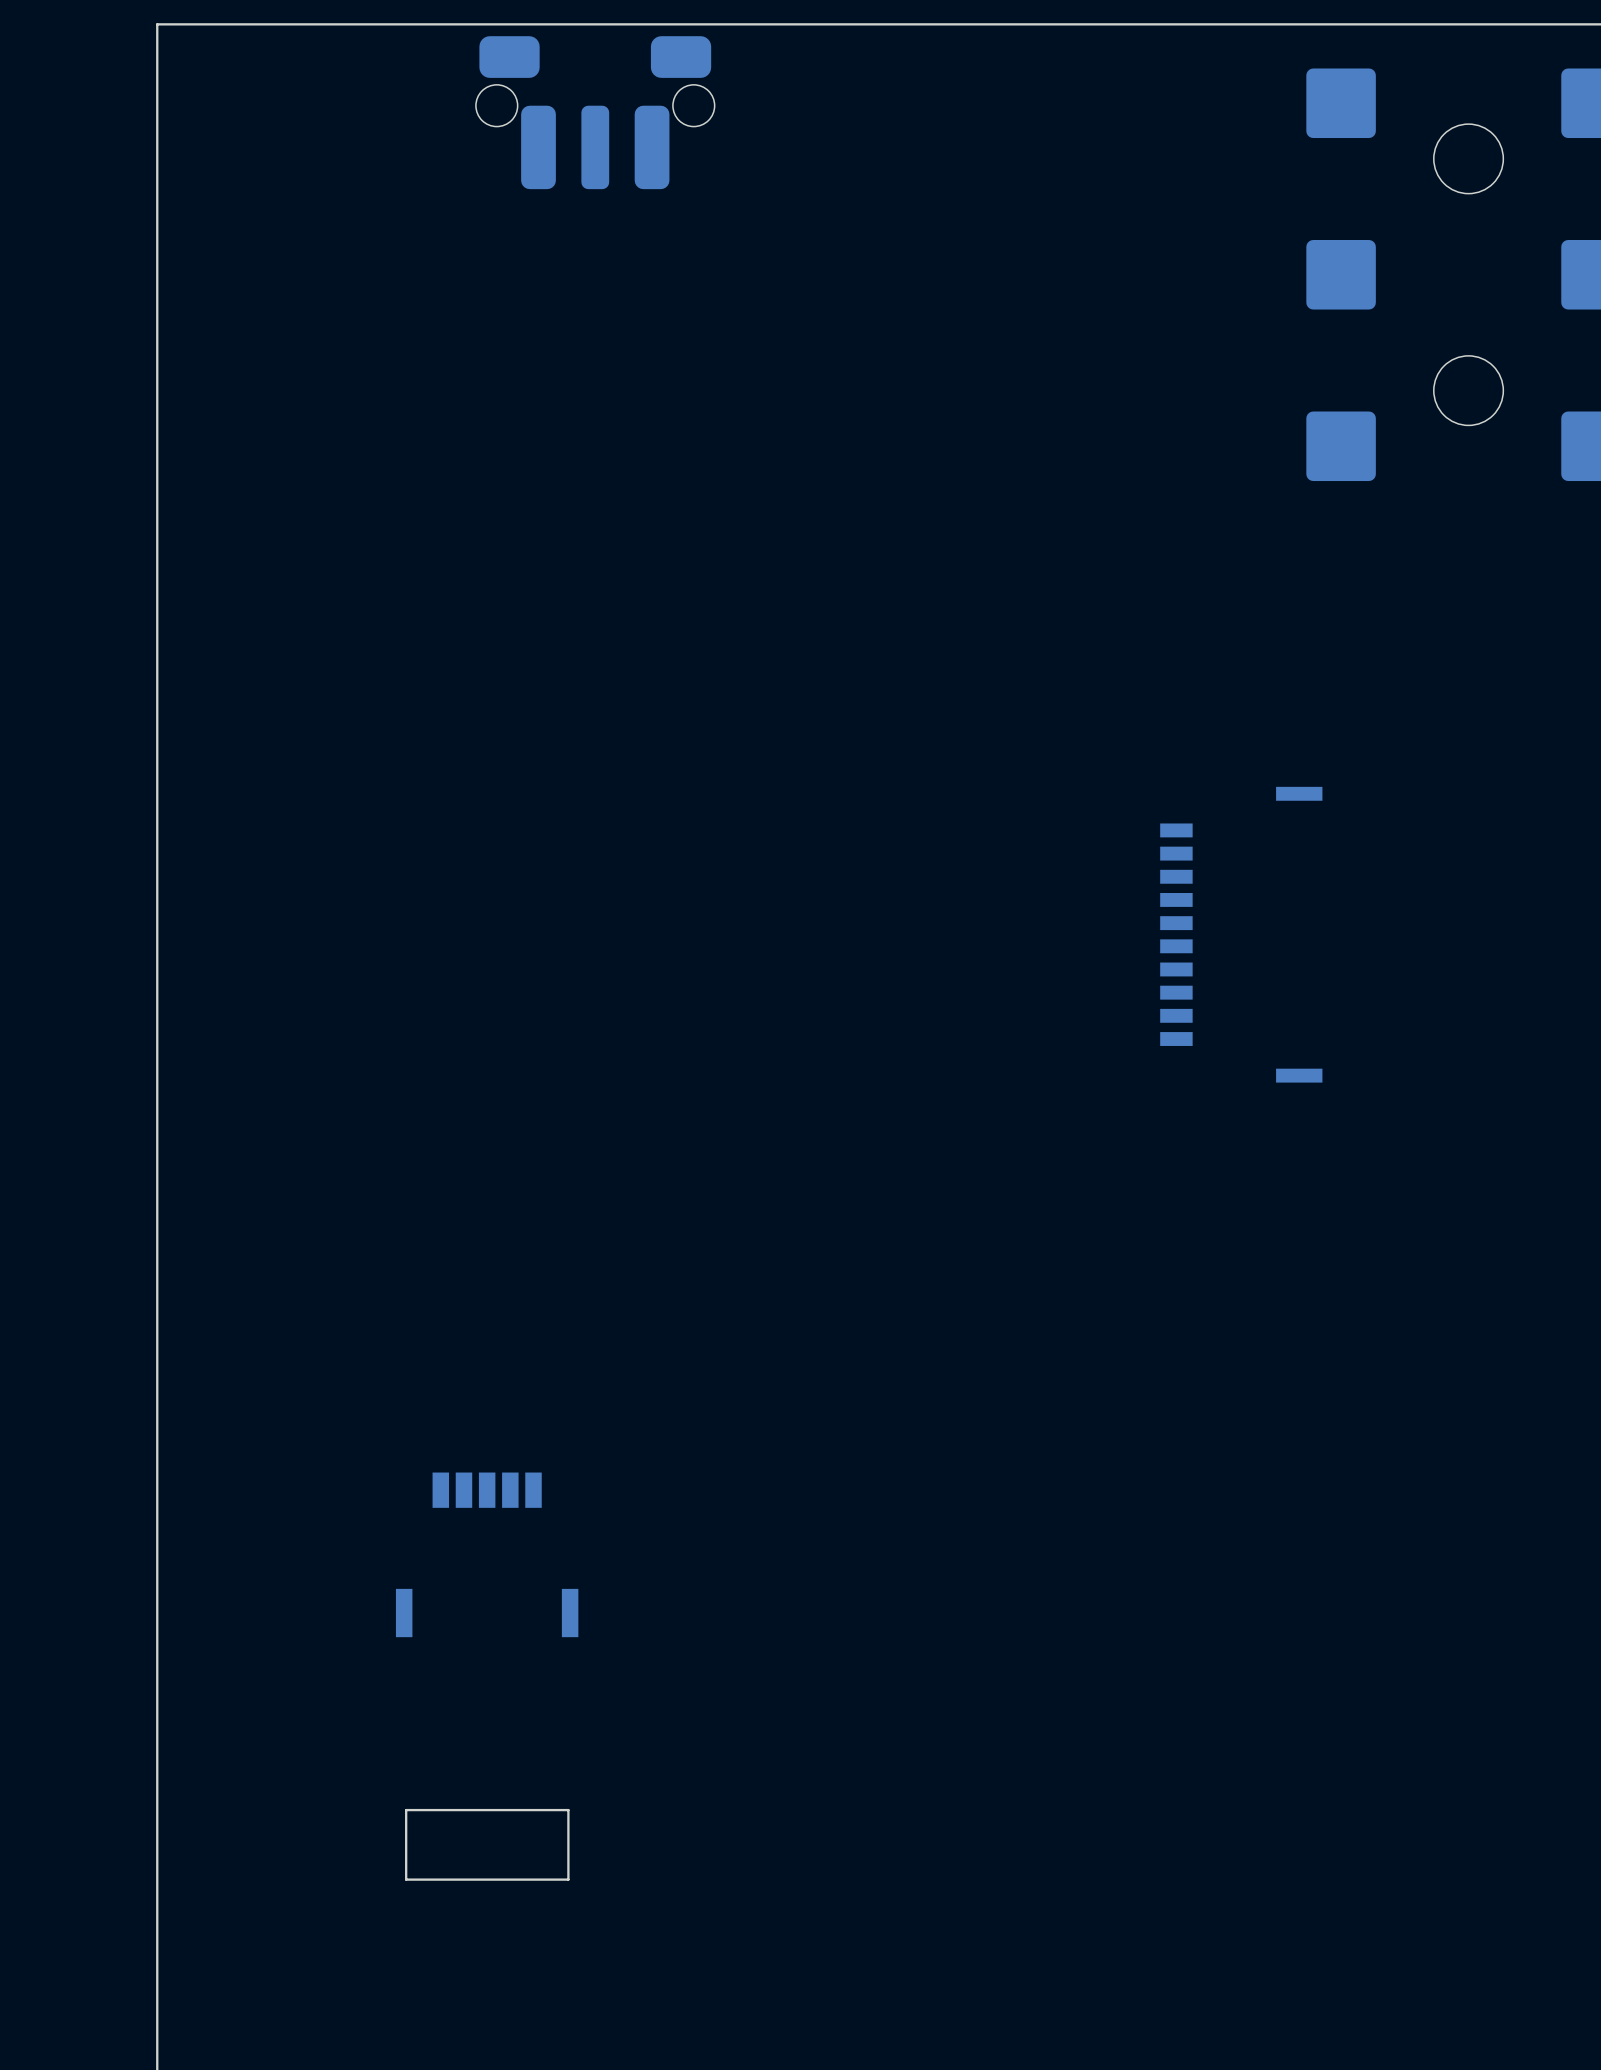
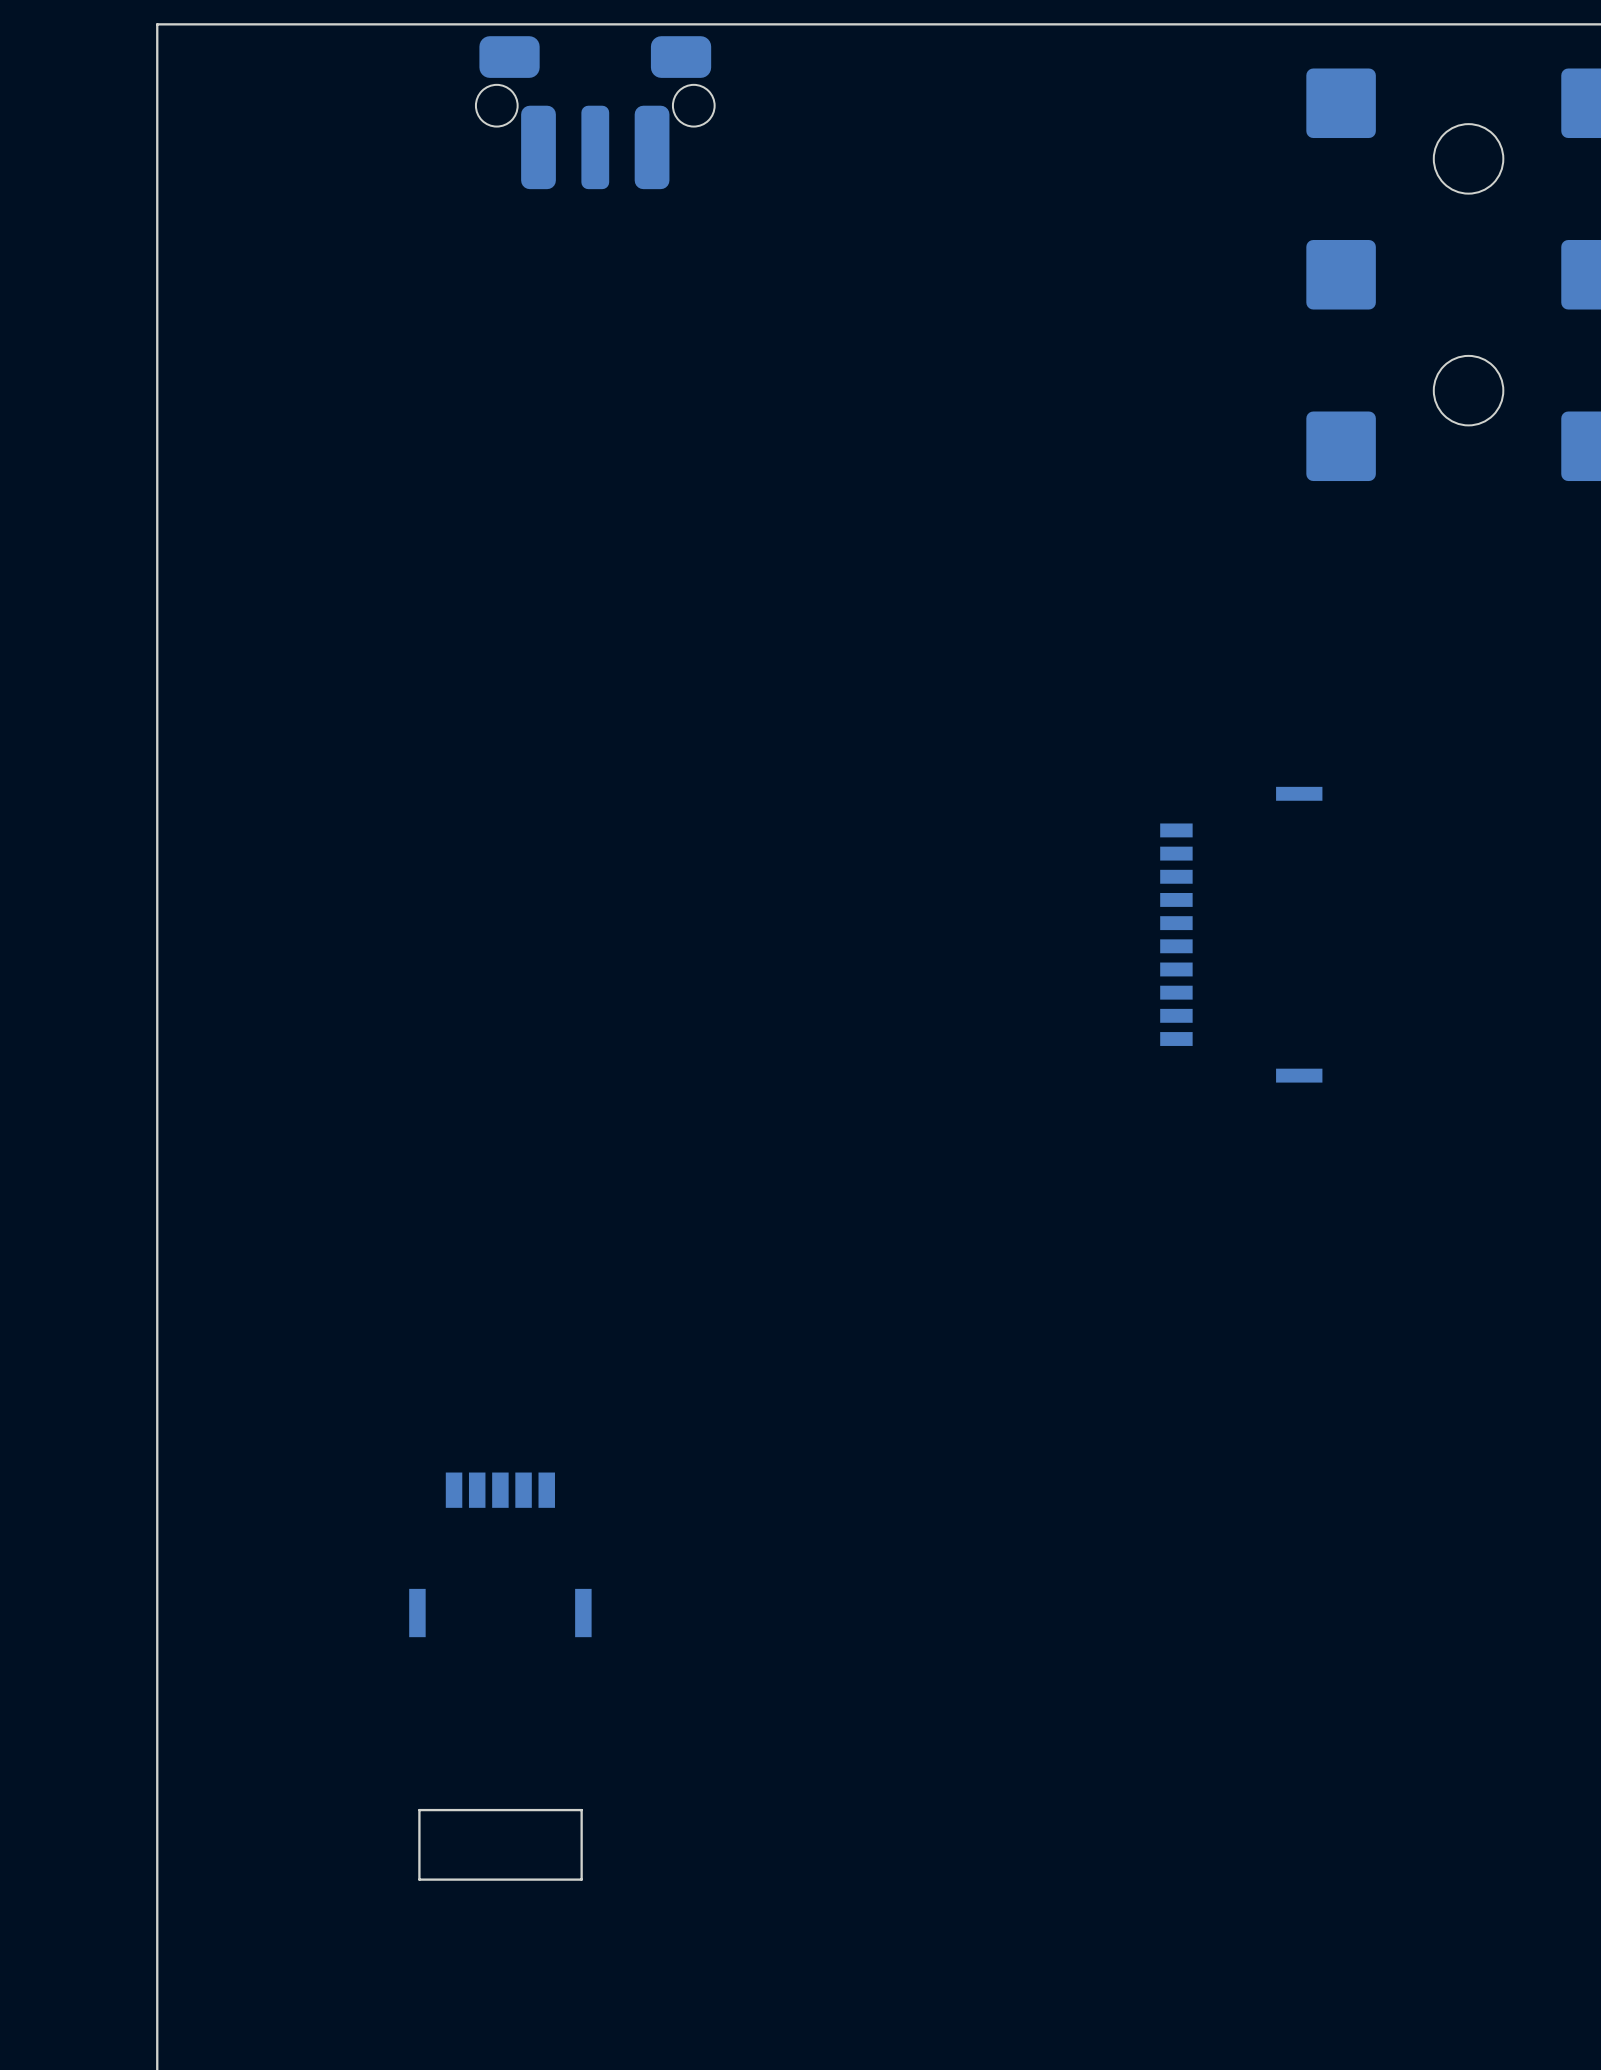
part position: (487, 1554) -> (500, 1554)
board edge: (419, 1810) (406, 1810) (406, 1879) (419, 1879) -> (419, 1810) (419, 1879)
board edge: (568, 1810) (568, 1879) -> (568, 1810) (581, 1810) (581, 1879) (568, 1879)

